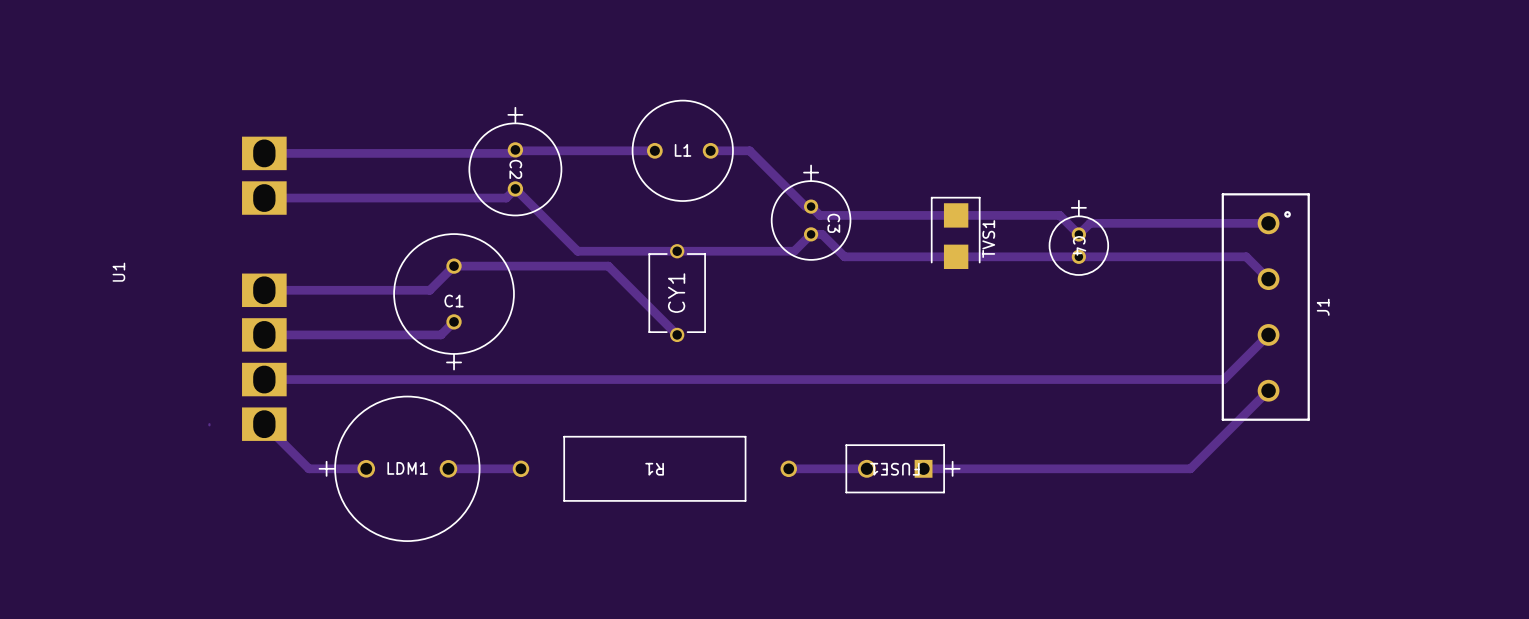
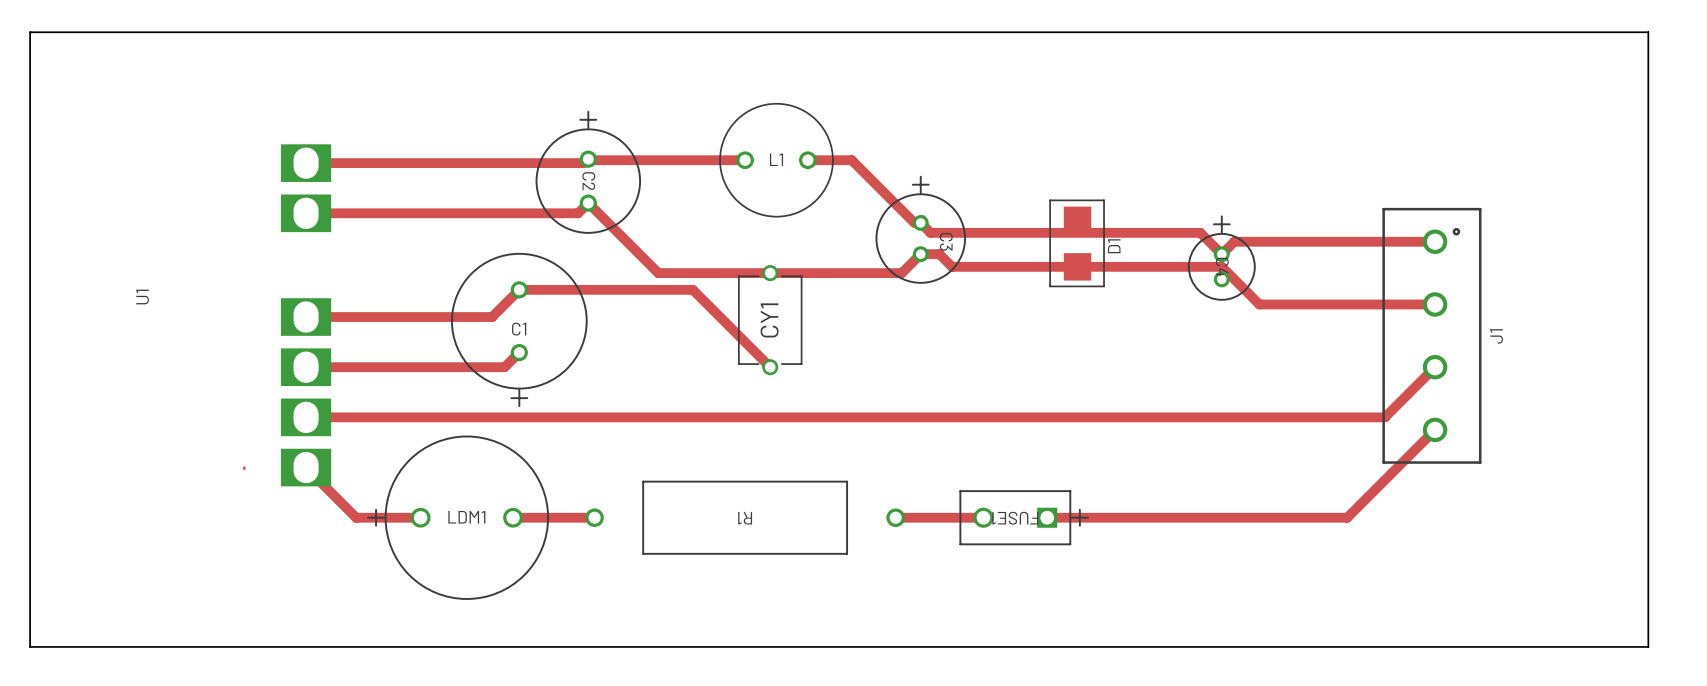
board edge: none -> (30, 32) (1648, 32) (1648, 646) (30, 646) (30, 32)
D1: none -> (1077, 243)
TVS1: (955, 233) -> none
track: (822, 234) (844, 256) (1246, 256) (1268, 279) -> (933, 254) (939, 254) (952, 266) (1221, 266) (1259, 304) (1435, 304)

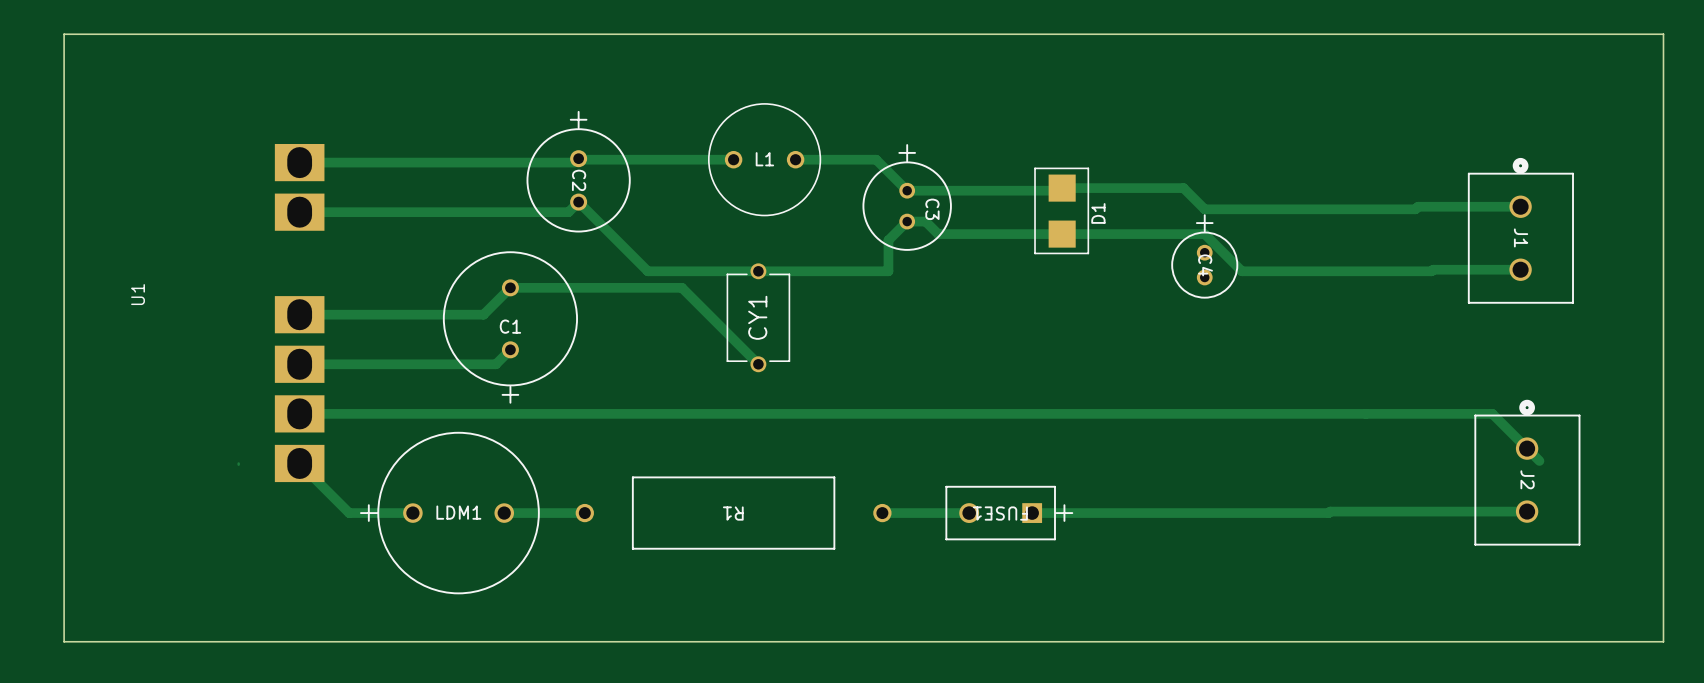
board edge: (30, 32) (1648, 32) (1648, 646) (30, 646) (30, 32) -> (64, 34) (1663, 34) (1663, 641) (64, 641) (64, 34)
track: (851, 160) (914, 222) (920, 222) (930, 232) (1200, 232) (1221, 254) (1234, 241) (1435, 241) -> (838, 159) (876, 159) (907, 190)
track: none -> (907, 190) (1183, 188) (1204, 209) (1415, 209) (1418, 206) (1520, 206)
J1 footprint: [1382, 207, 1482, 464] -> [1467, 157, 1574, 304]
C3 position: (920, 229) -> (907, 197)
D1 position: (1077, 243) -> (1061, 210)
track: (901, 273) (920, 254) (939, 254) (952, 266) (1221, 266) (1259, 304) (1435, 304) -> (888, 271) (888, 240) (907, 221) (925, 221) (938, 234) (1204, 234) (1241, 271) (1520, 269)
J1 name position: J1 (1496, 336) -> J1 (1521, 237)
track: (1435, 367) (1384, 417) -> (1539, 460) (1492, 413) (1365, 413)
track: (1435, 429) (1348, 516) -> (1527, 511) (1330, 511)
J2: none -> (1527, 472)

